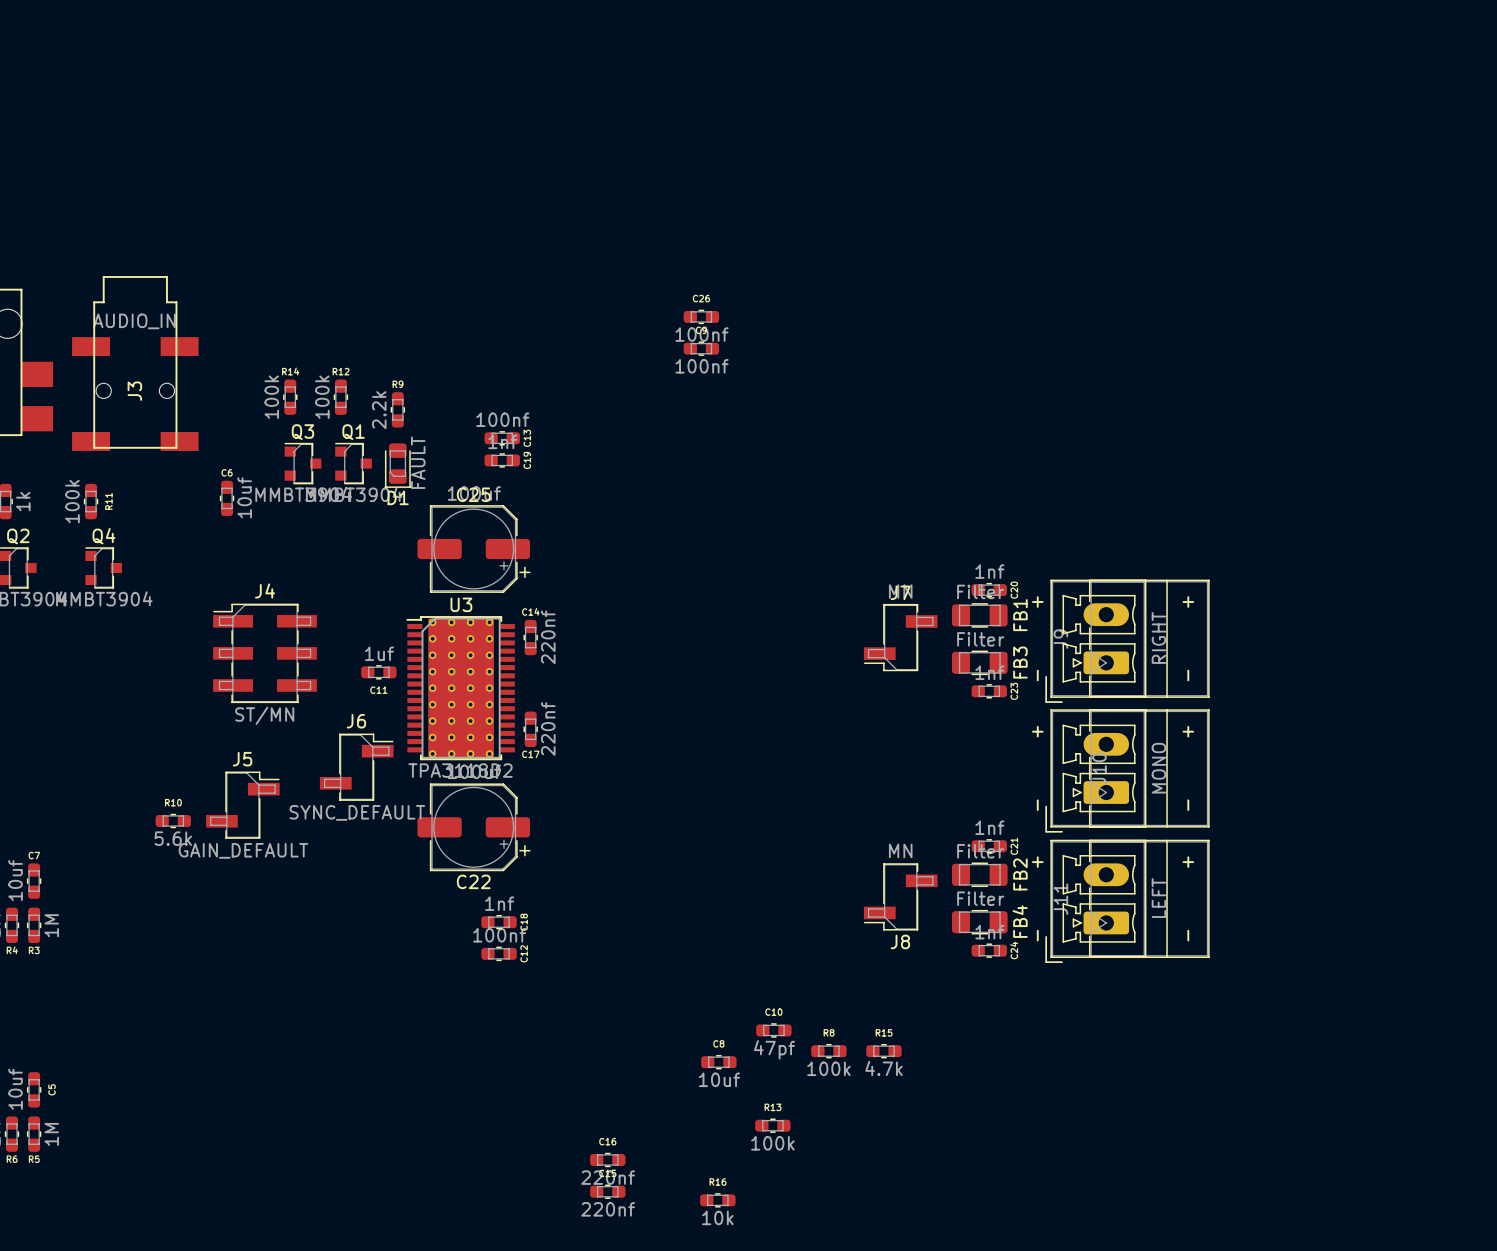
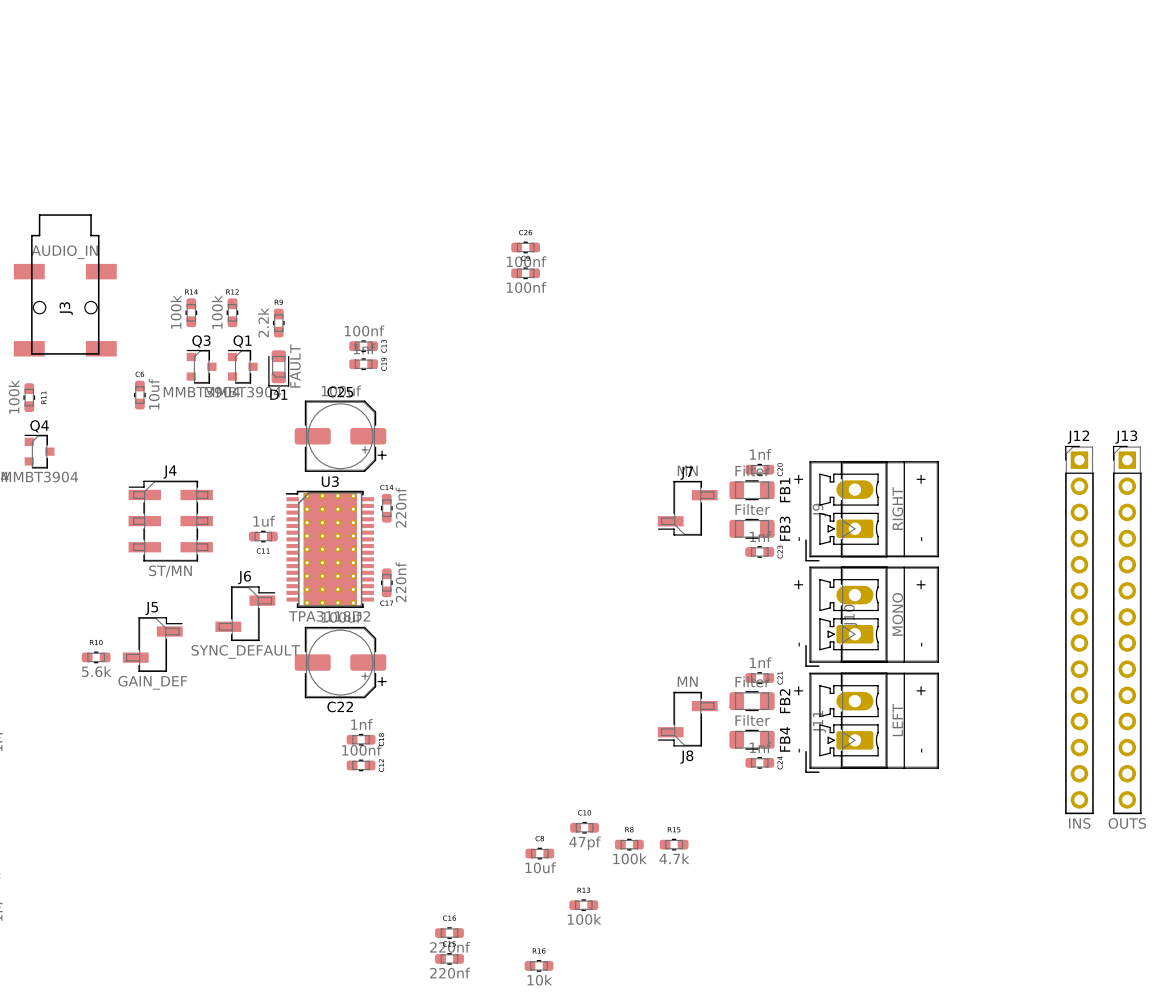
J12: none -> INS (1079, 630)
J13: none -> OUTS (1127, 630)
J5 value: GAIN_DEFAULT (243, 850) -> GAIN_DEF (152, 682)

